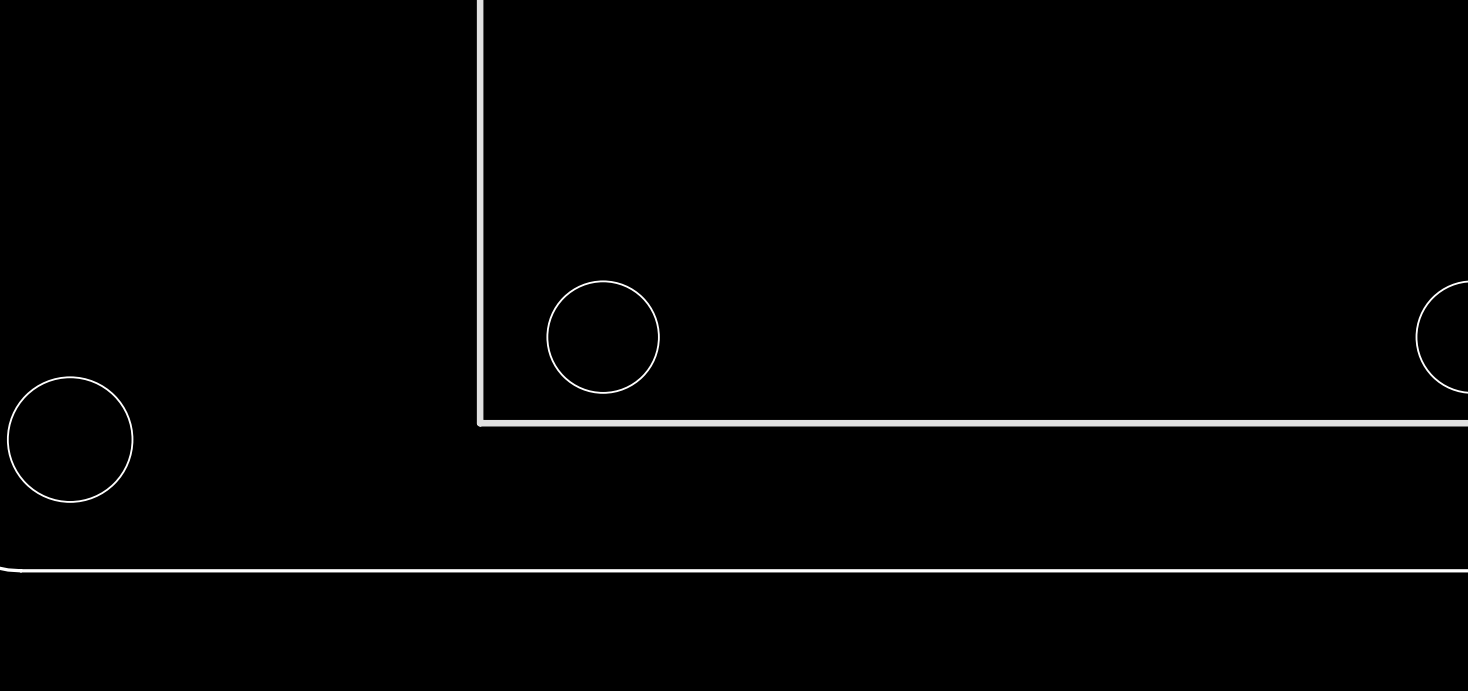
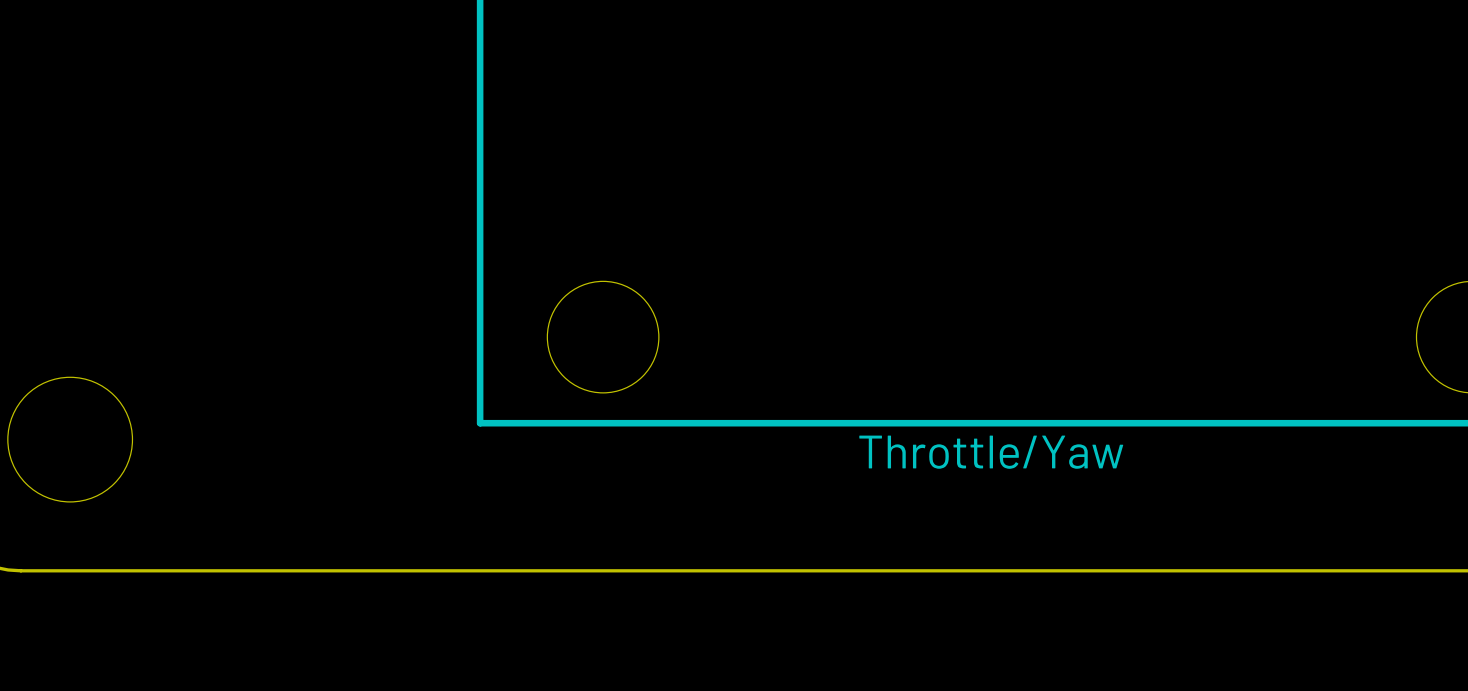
text: none -> Throttle/Yaw (991, 452)

